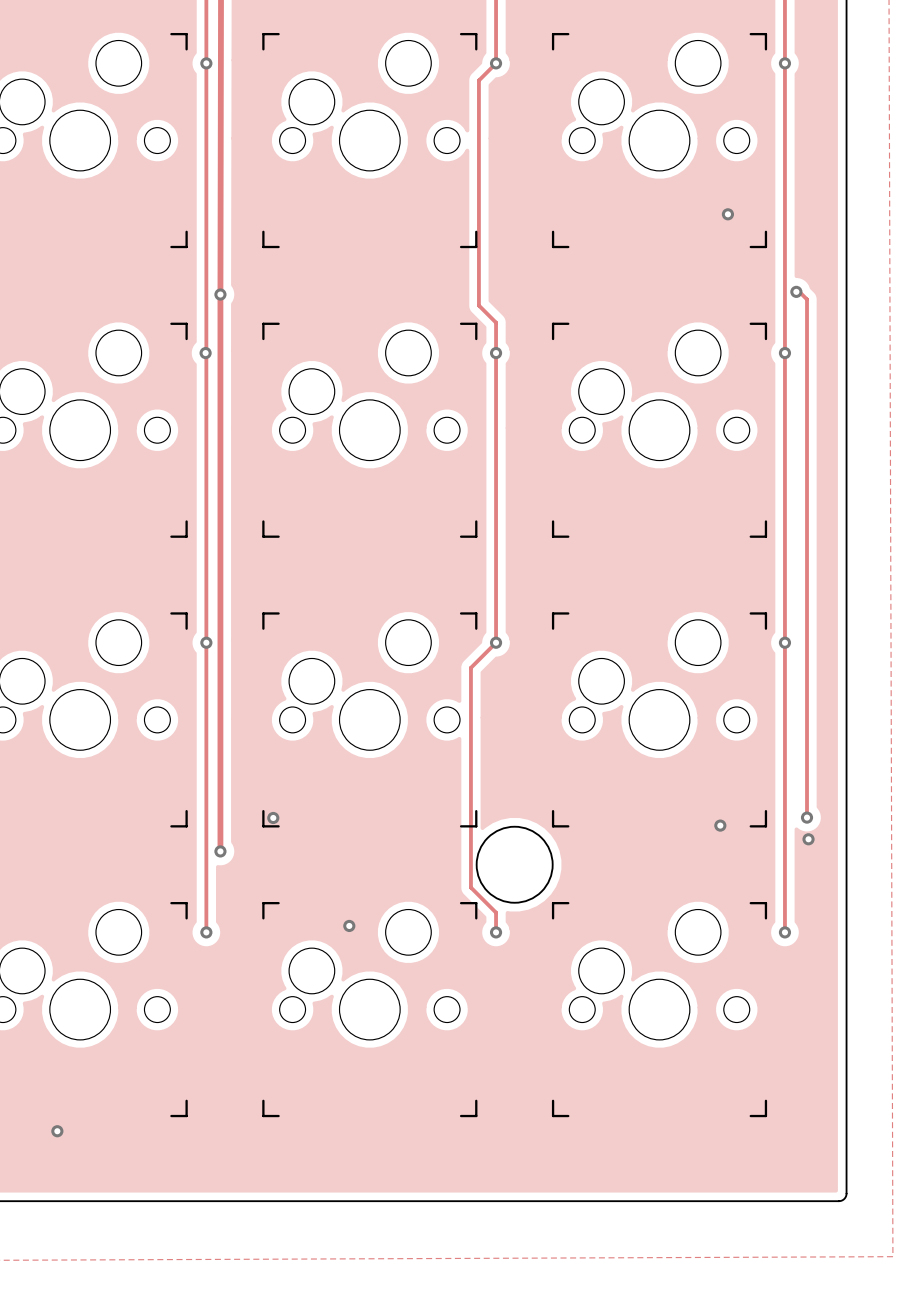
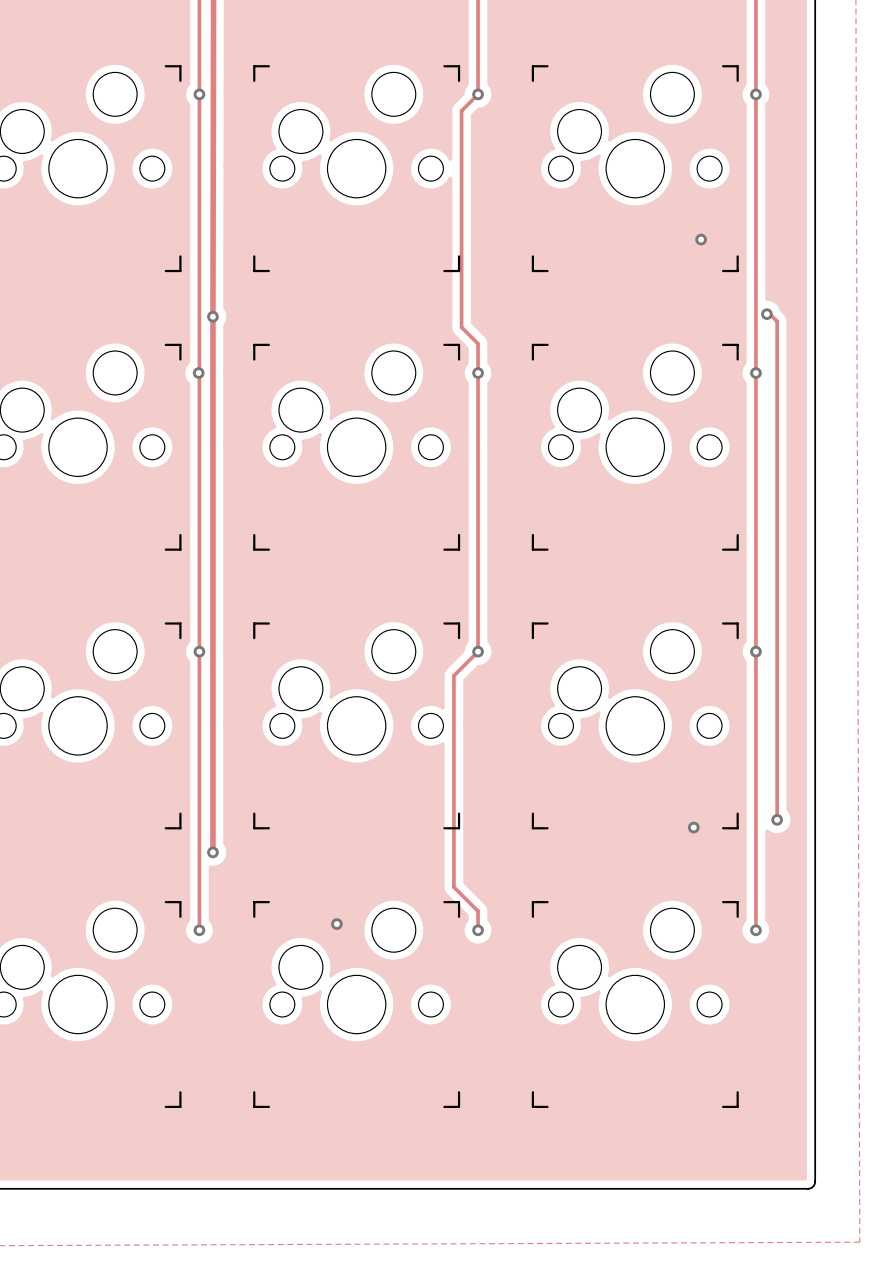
via: (273, 817) -> none
round board edge: [475, 825, 554, 904] -> none
via: (808, 839) -> none
via: (57, 1131) -> none

